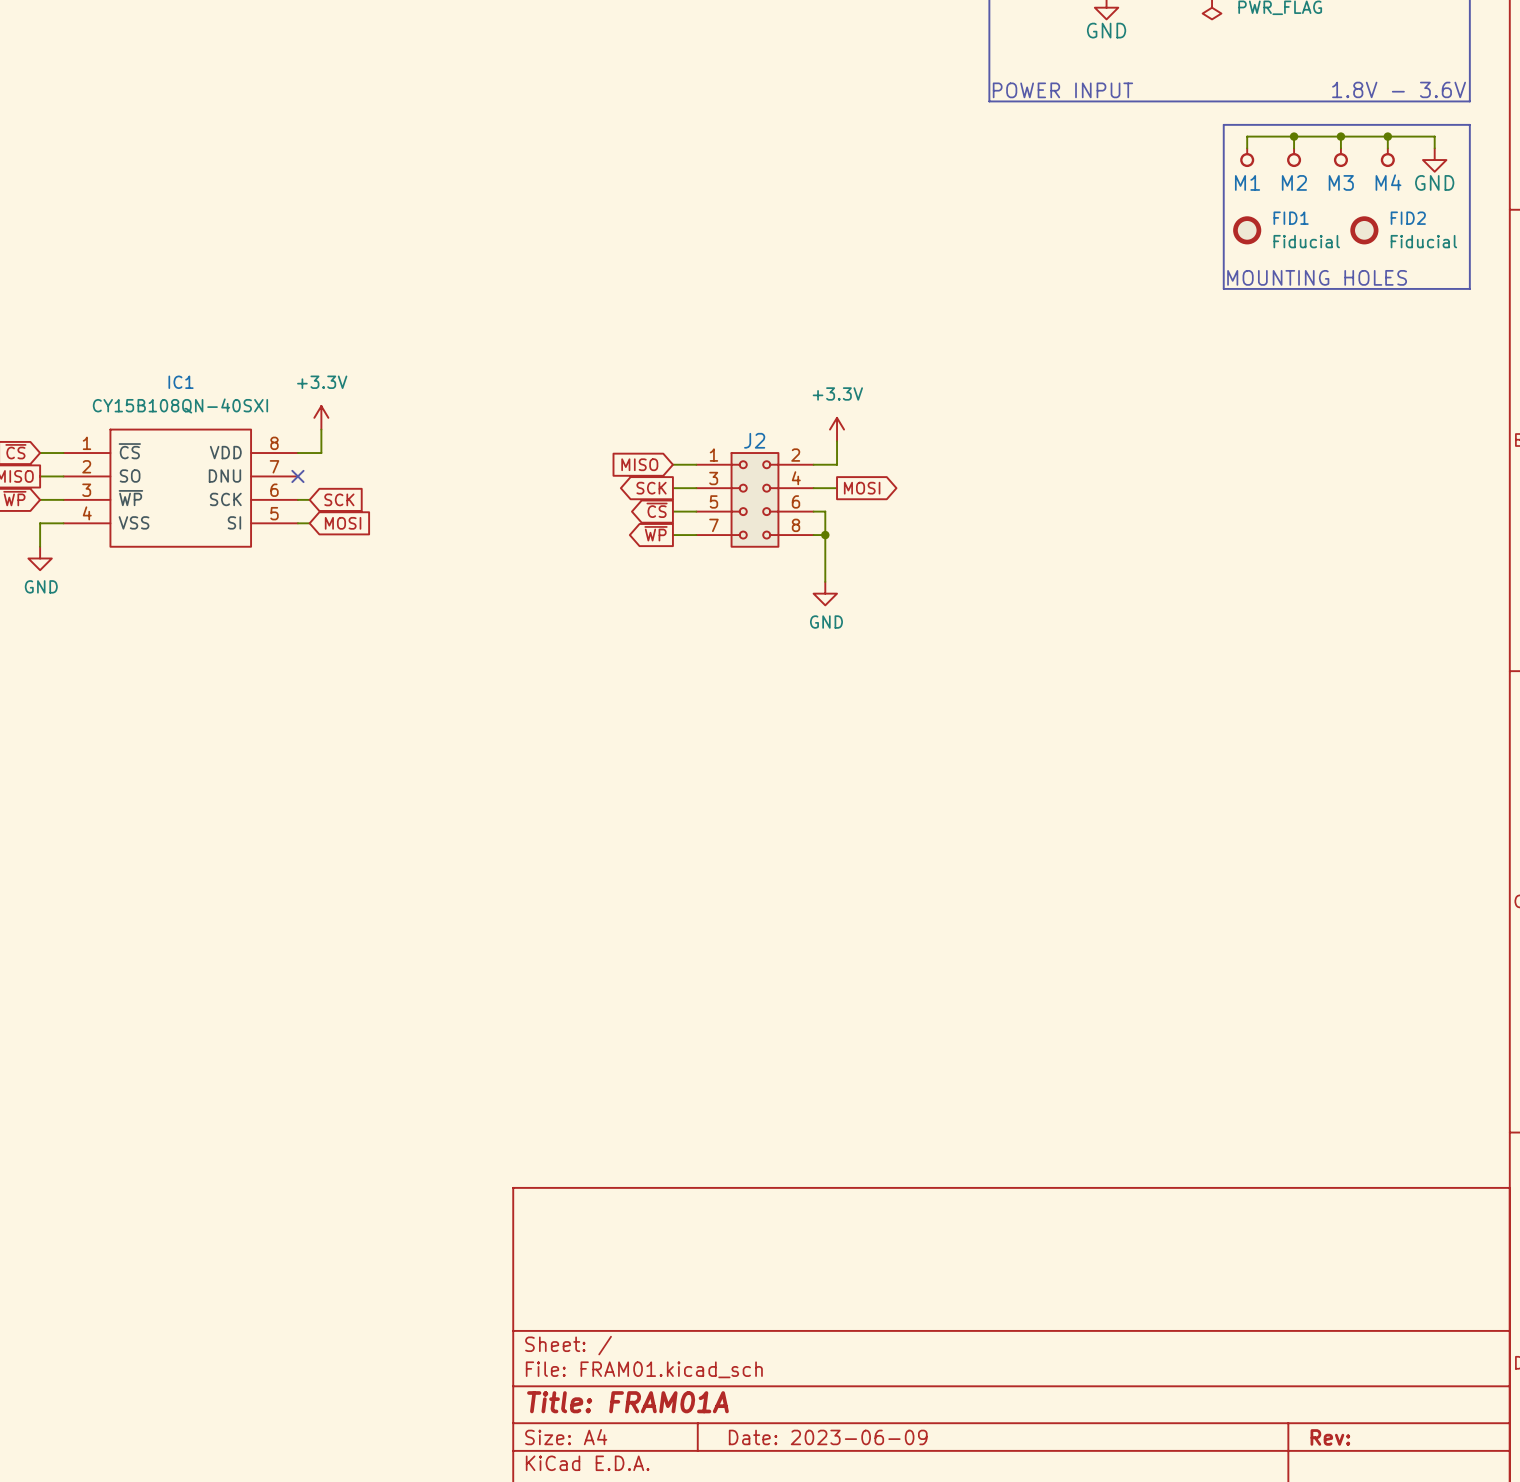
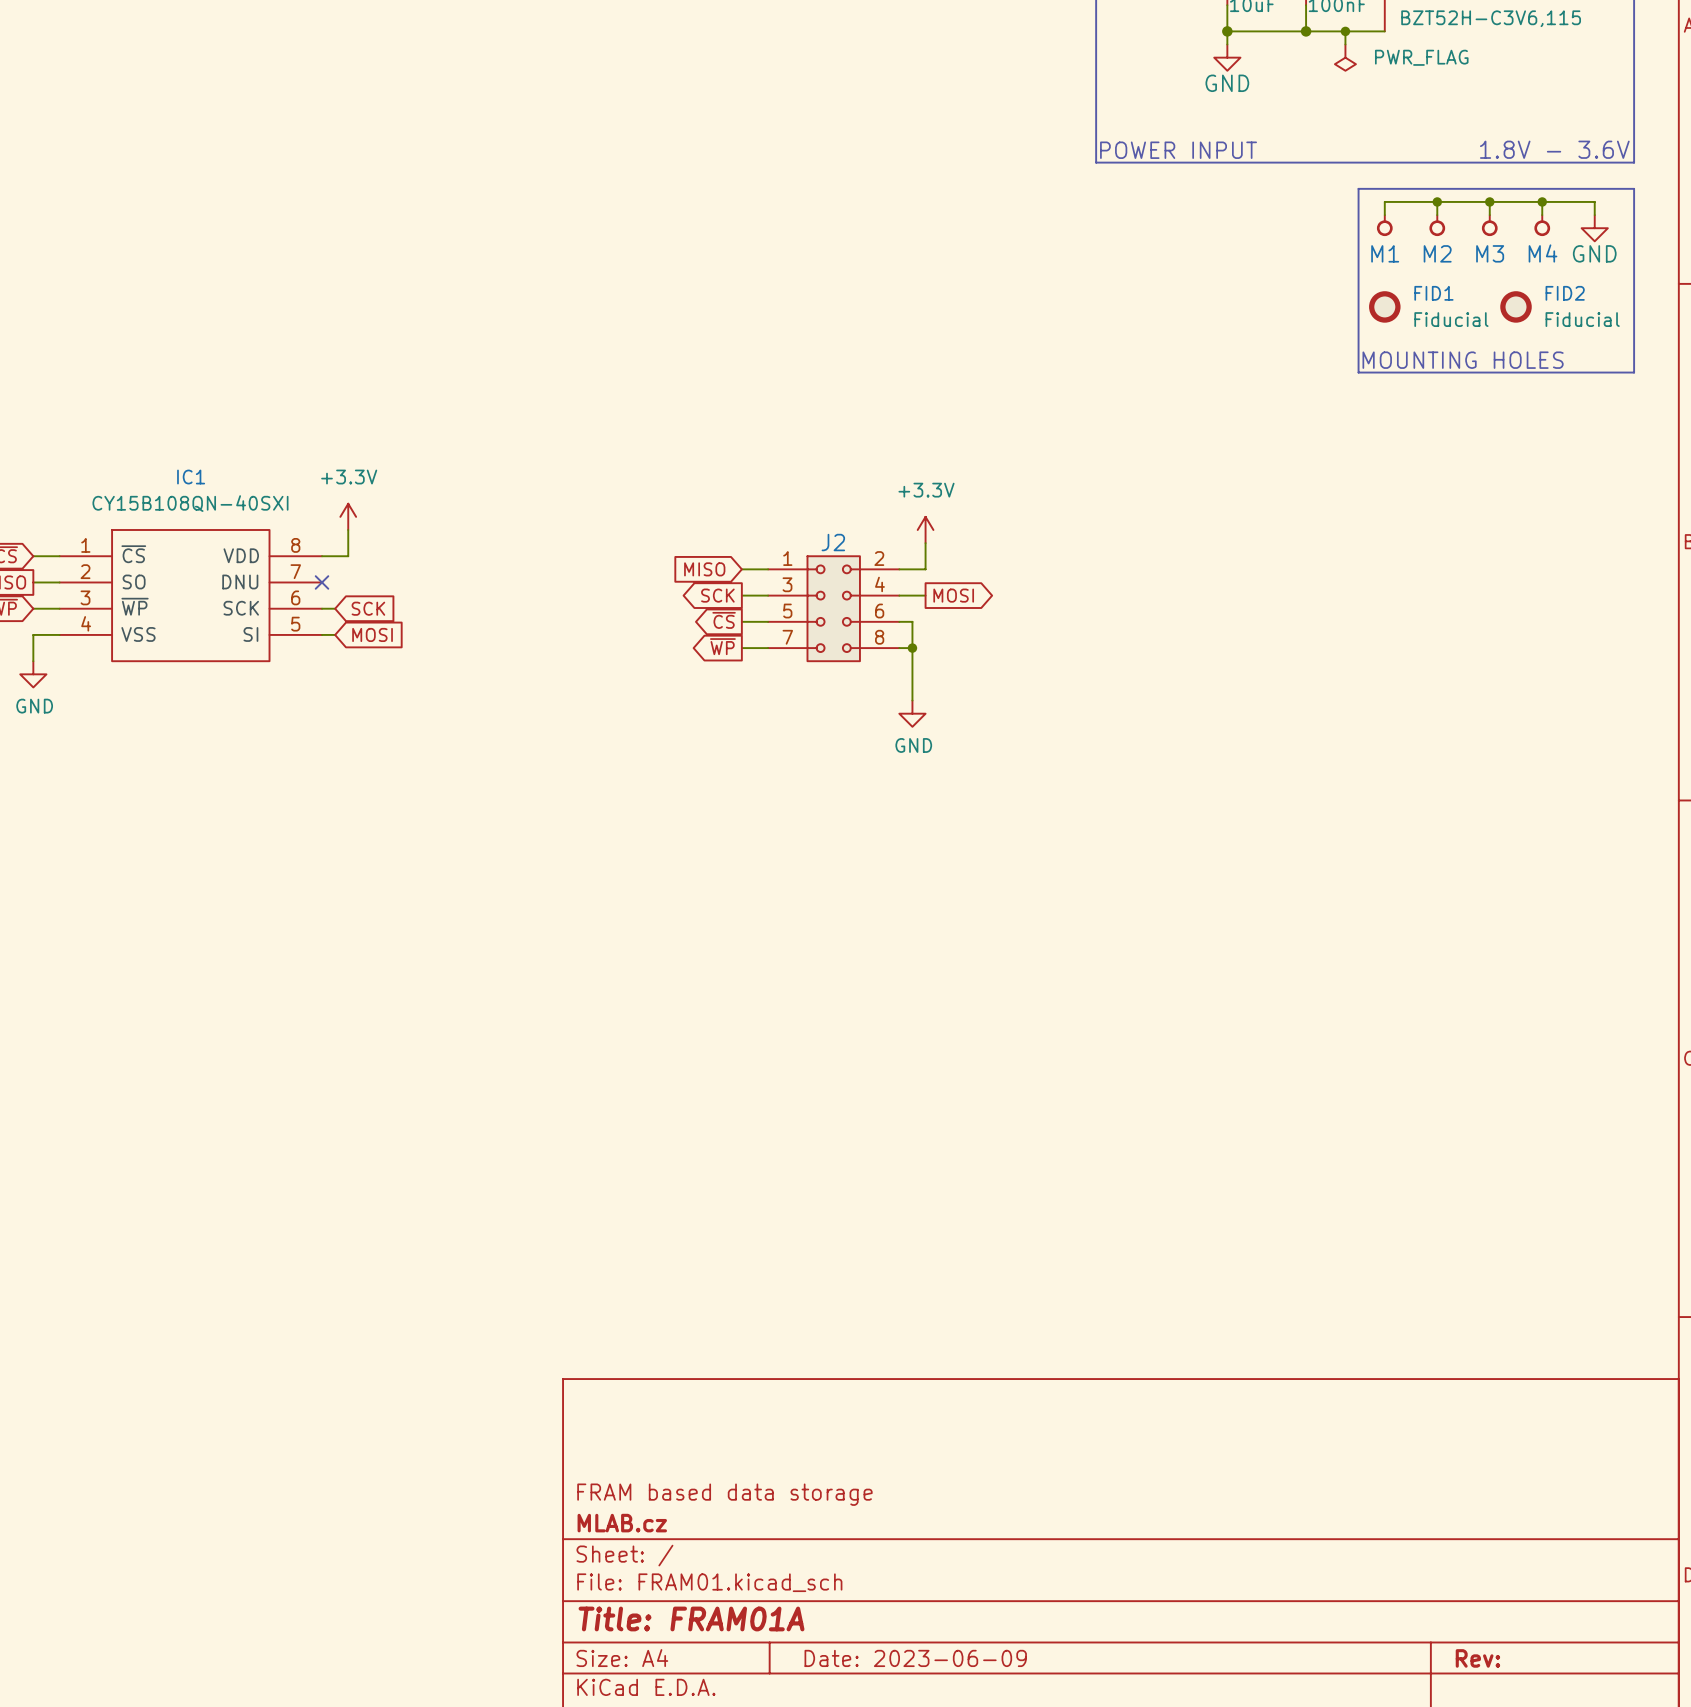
title block: none -> FRAM based data storage (724, 1494)
title block: none -> MLAB.cz (622, 1523)

